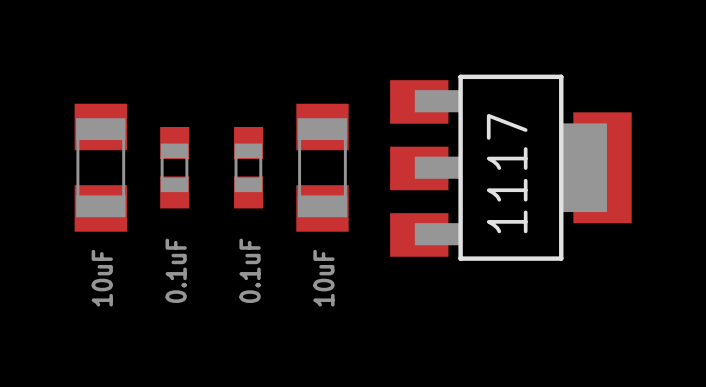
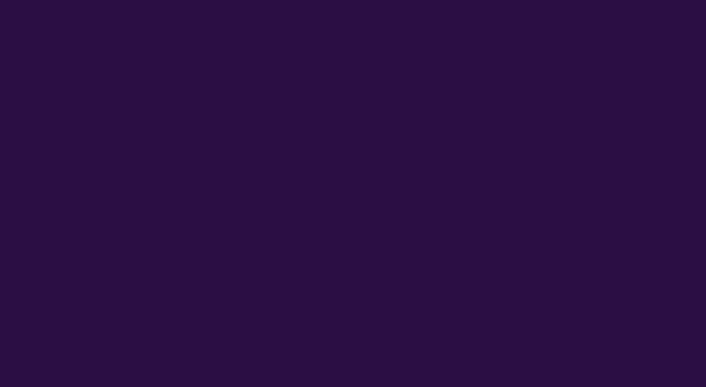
part: 10uF (100, 167) -> none
part: 0.1uF (174, 167) -> none
part: 0.1uF (248, 167) -> none
part: 10uF (322, 167) -> none
part: 1117 (510, 167) -> none

